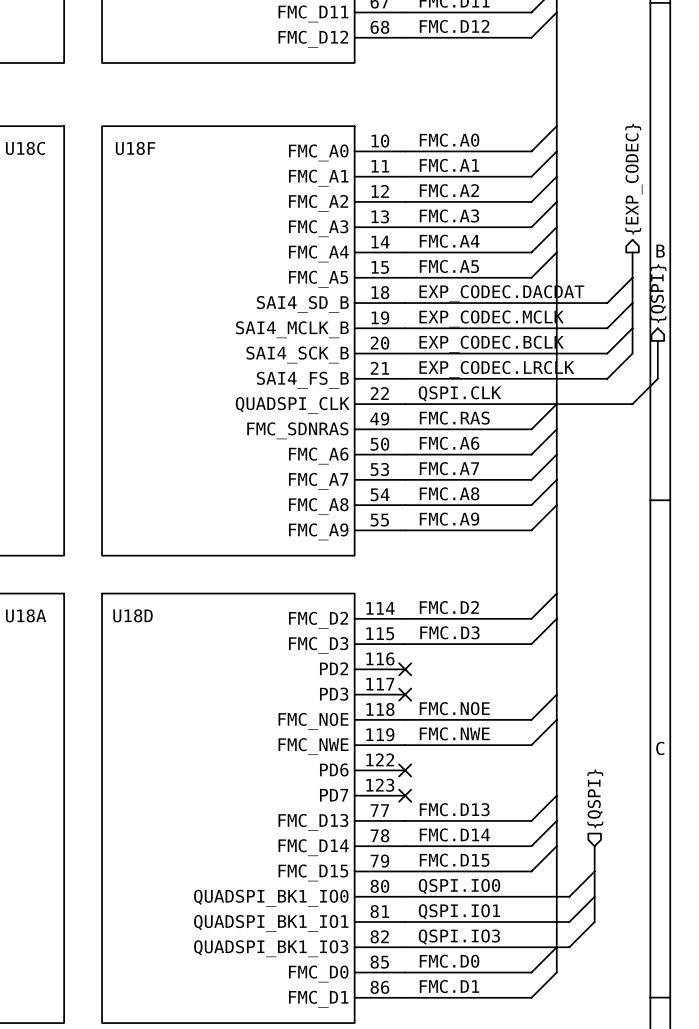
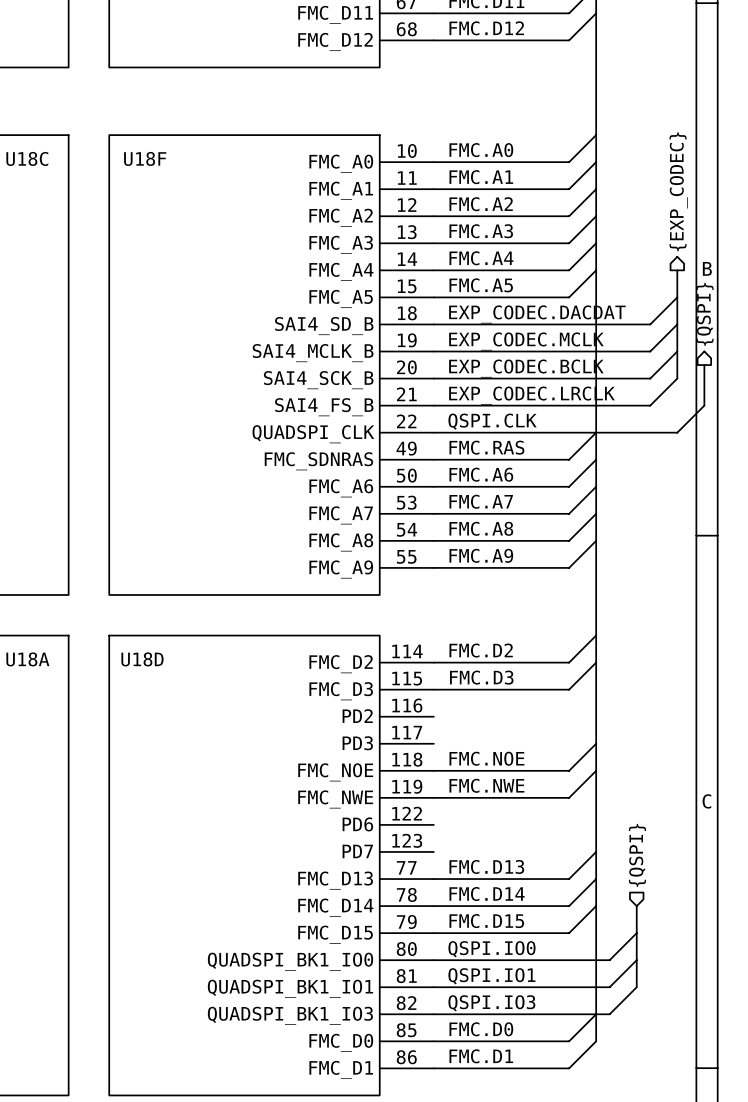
no-connect mark: (405, 669) -> none
no-connect mark: (405, 694) -> none
no-connect mark: (405, 770) -> none
no-connect mark: (405, 795) -> none

